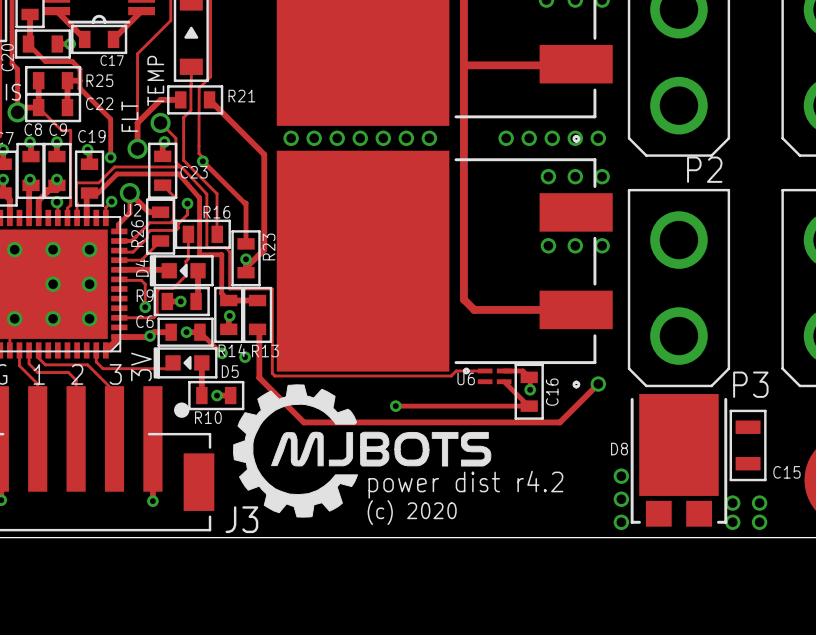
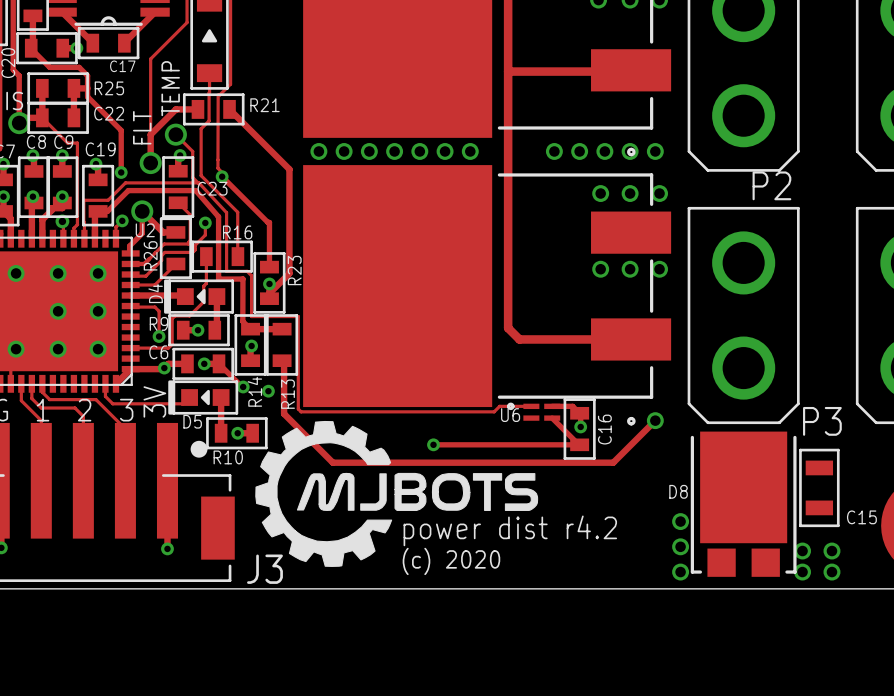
R14 name rotation: 0° (232, 350) -> 90° counterclockwise (254, 391)
R13 name rotation: 0° (265, 351) -> 90° counterclockwise (287, 394)
D5 name position: D5 (230, 371) -> D5 (192, 421)

